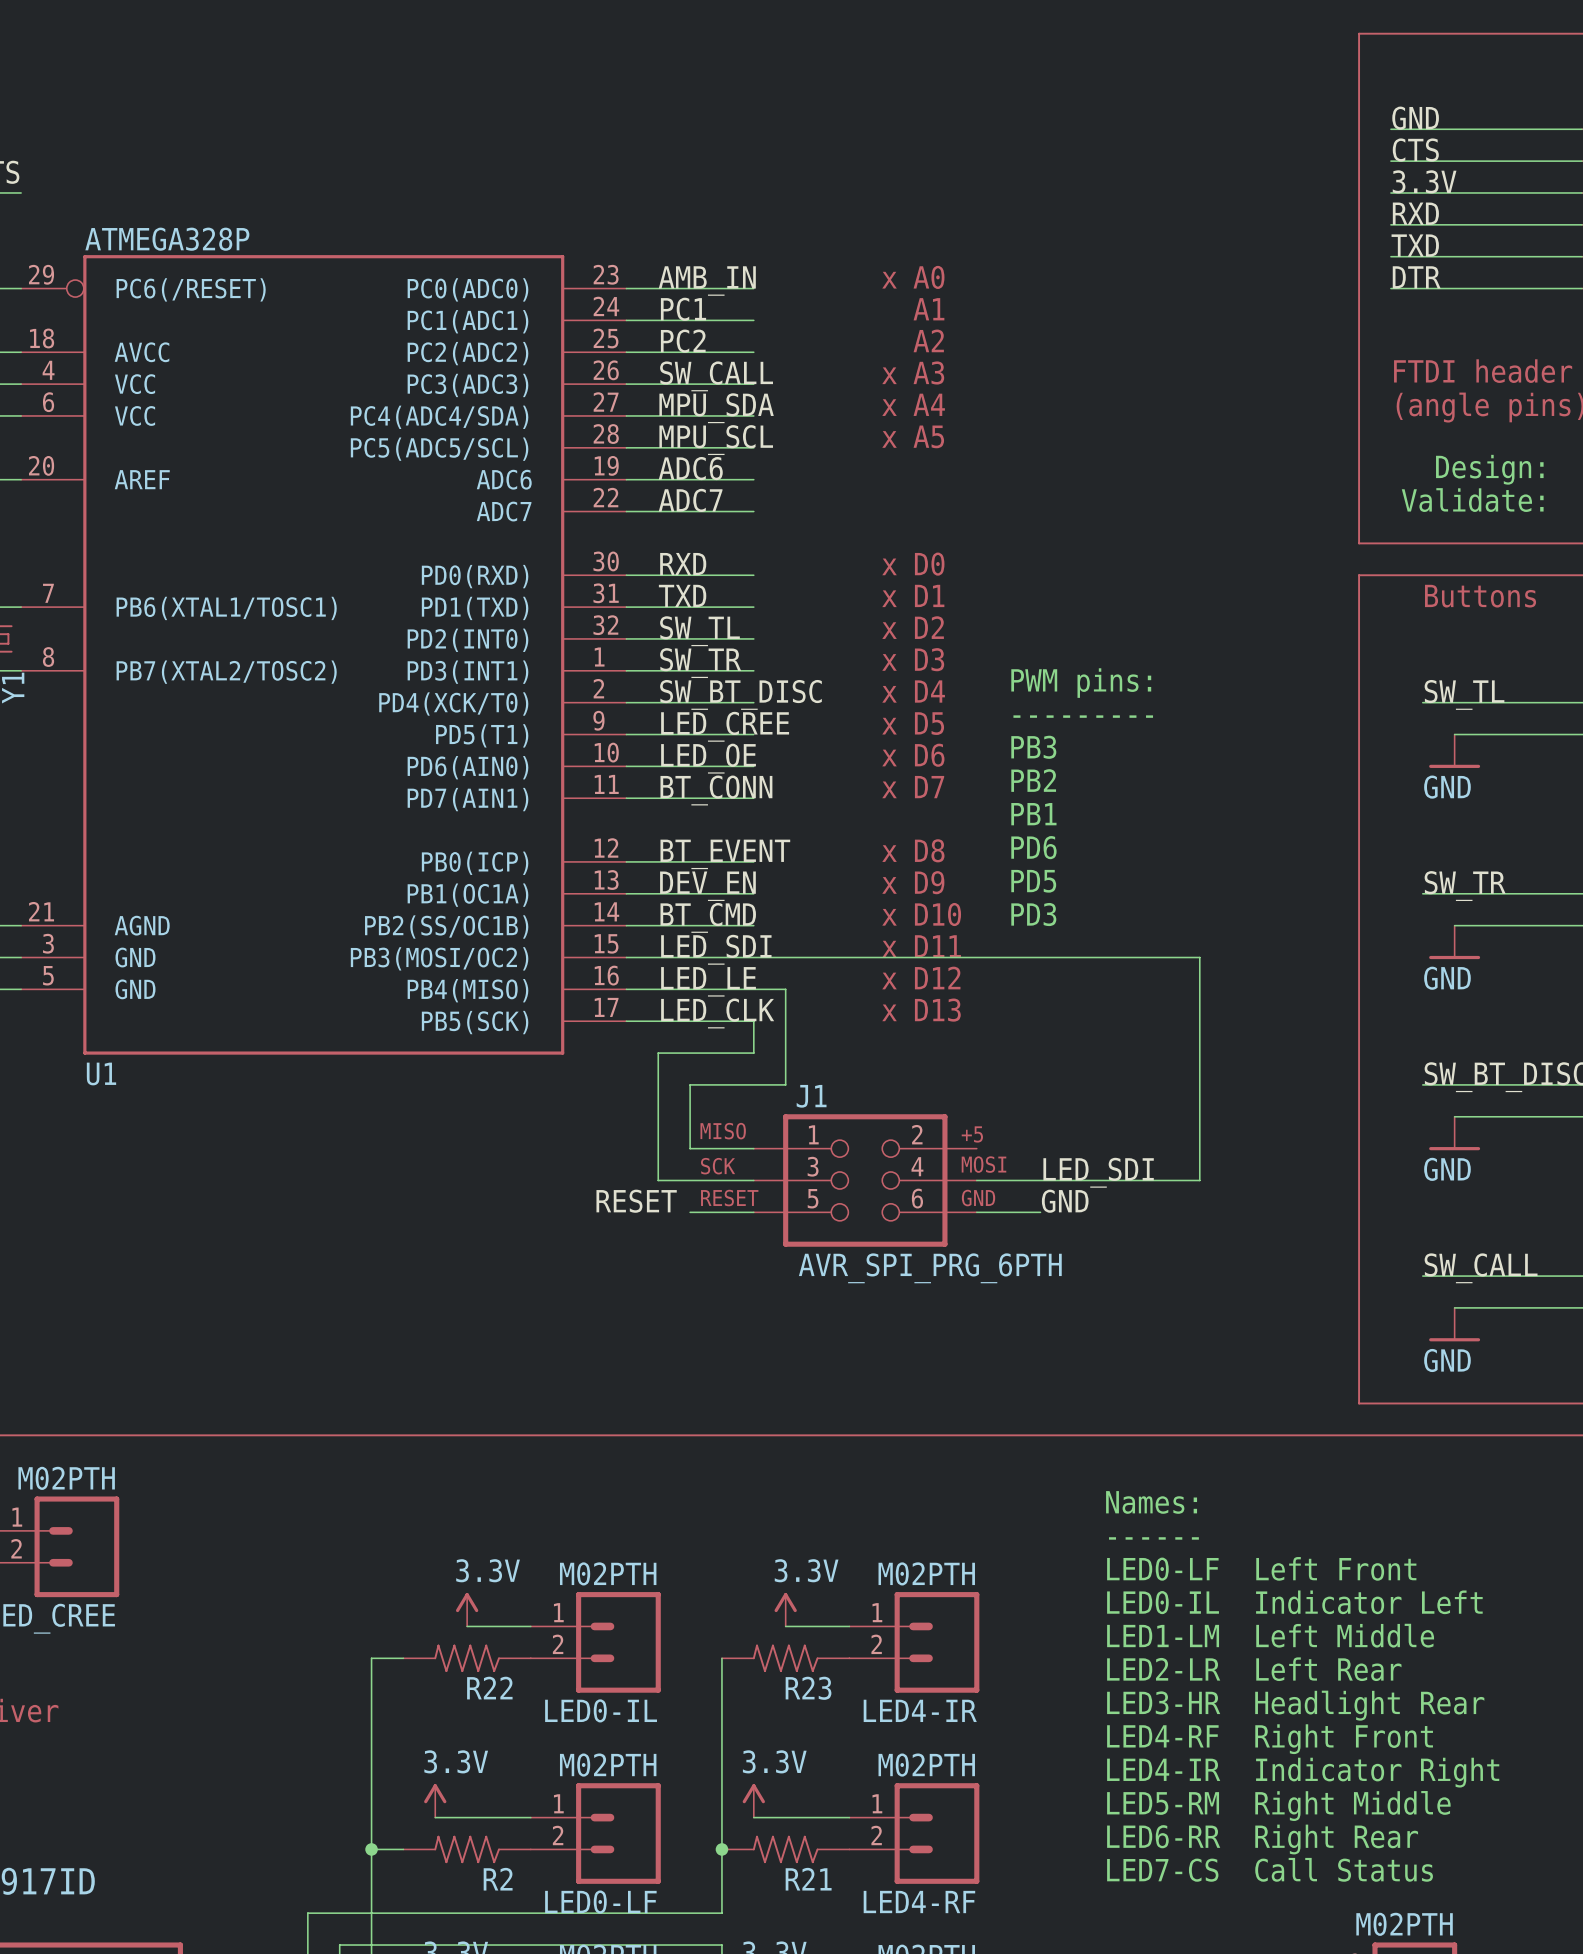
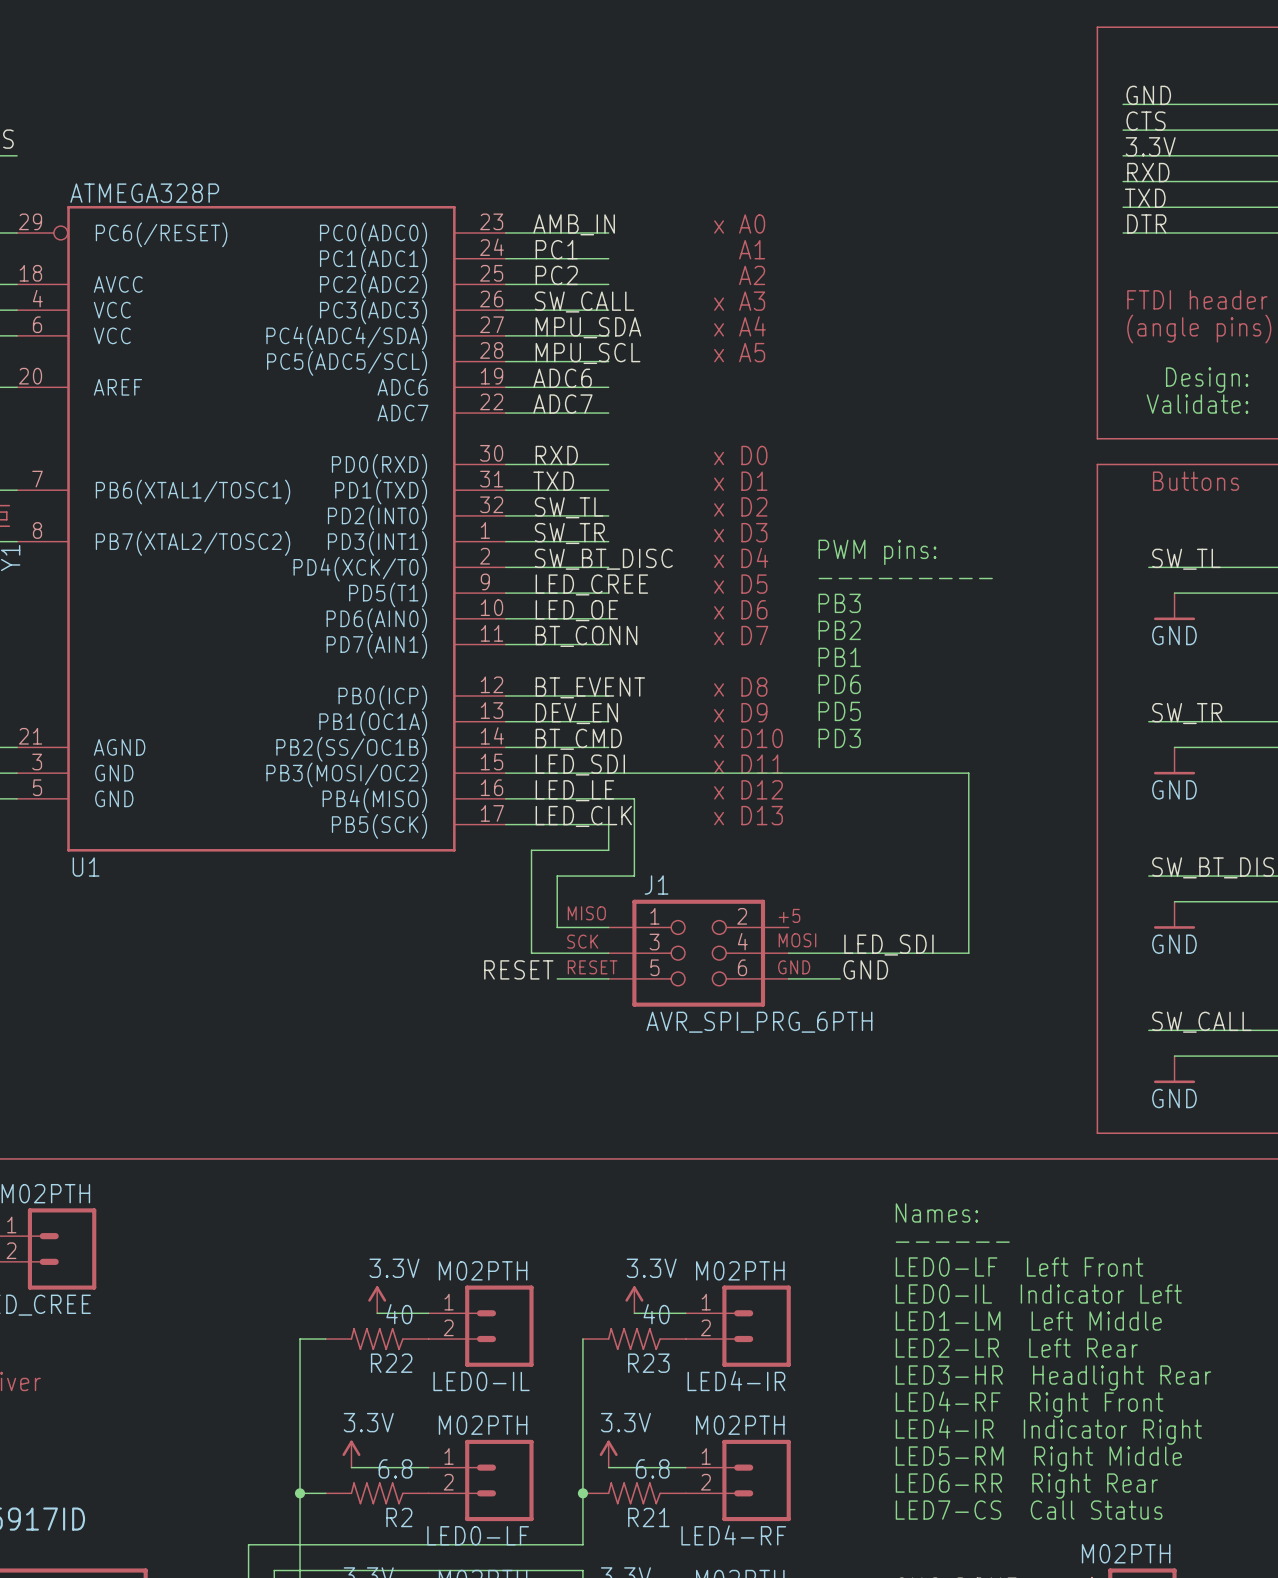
R22 value: none -> 40 (399, 1314)
R23 value: none -> 40 (656, 1314)
R2 value: none -> 6.8 (395, 1468)
R21 value: none -> 6.8 (652, 1468)

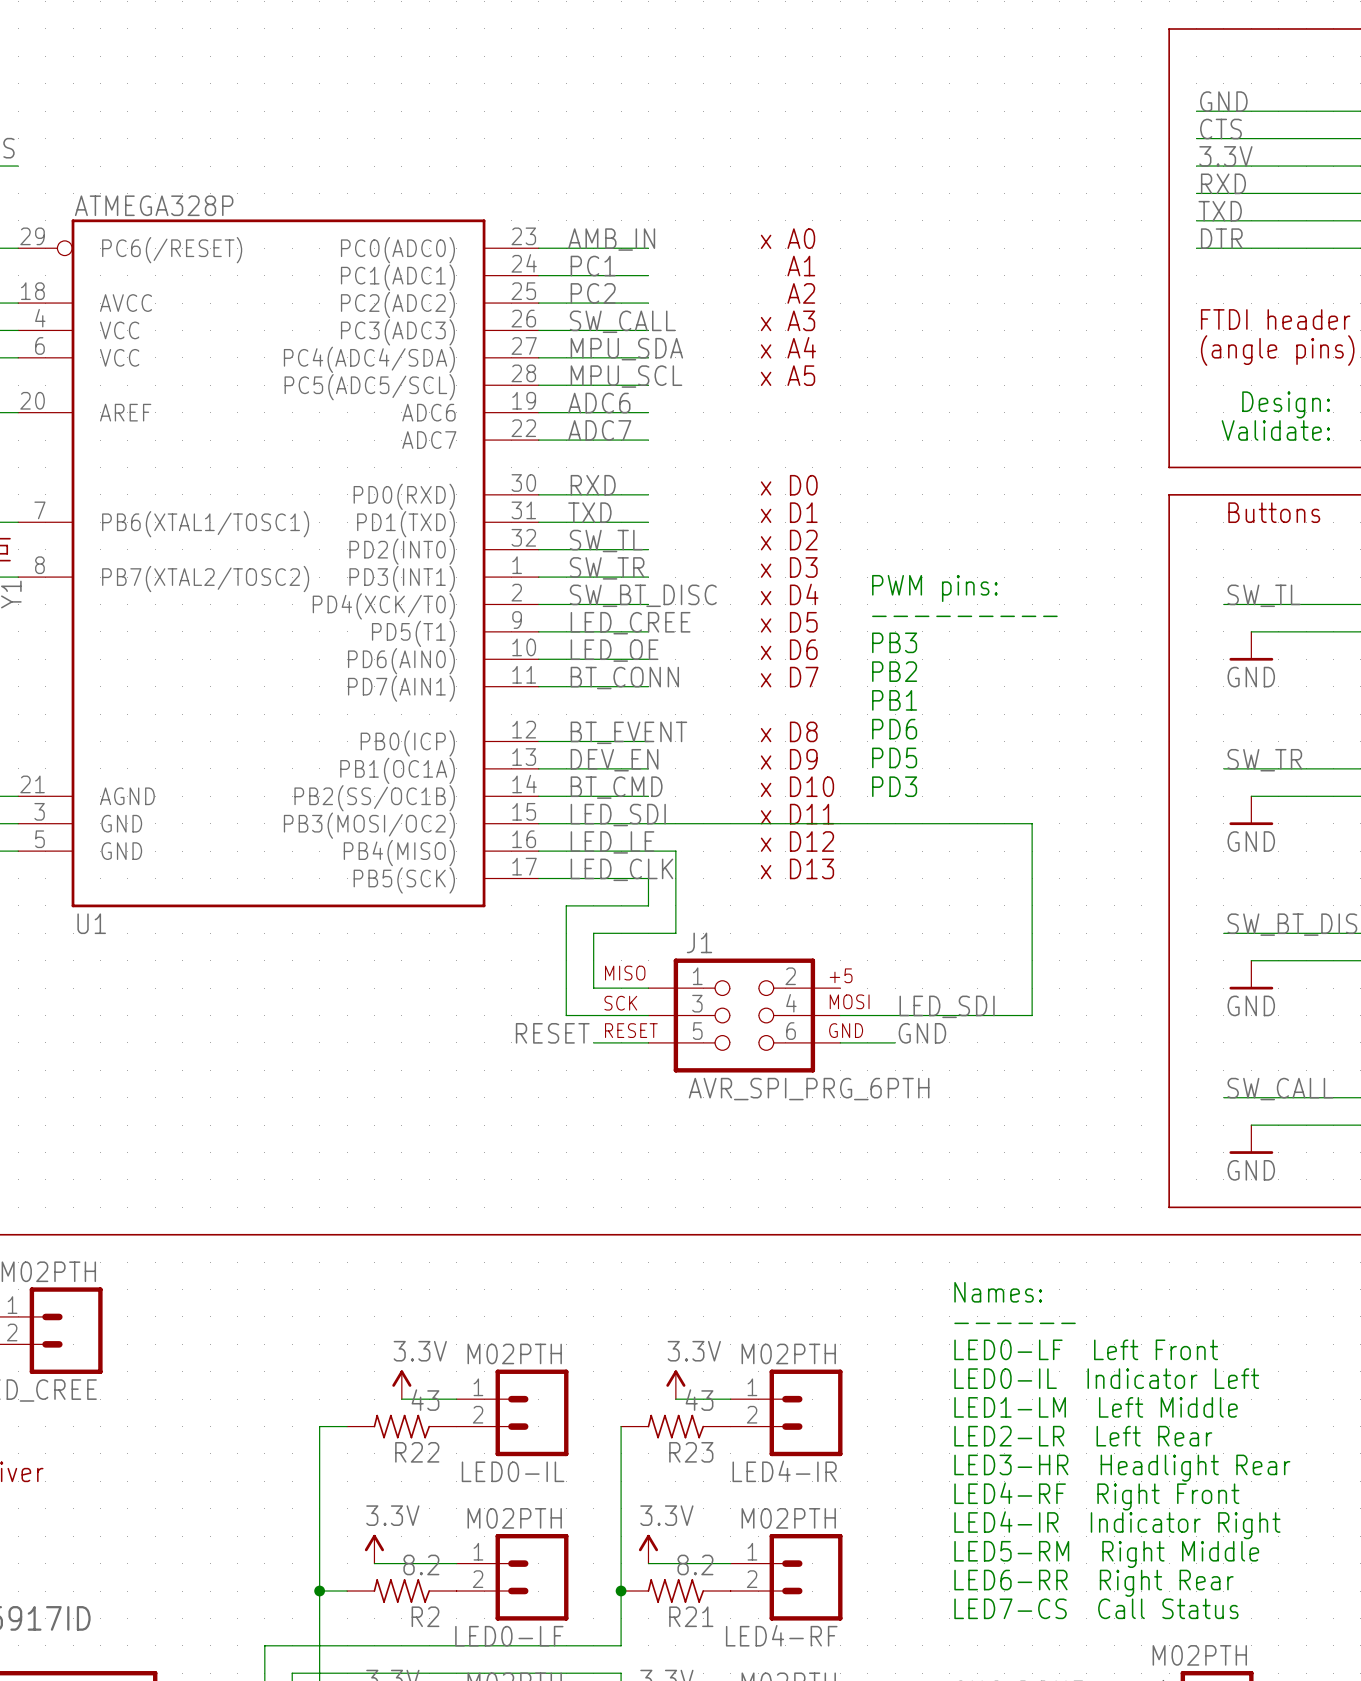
R22 value: 40 (399, 1314) -> 43 (425, 1400)
R23 value: 40 (656, 1314) -> 43 (699, 1400)
R2 value: 6.8 (395, 1468) -> 8.2 (421, 1564)
R21 value: 6.8 (652, 1468) -> 8.2 (695, 1564)

